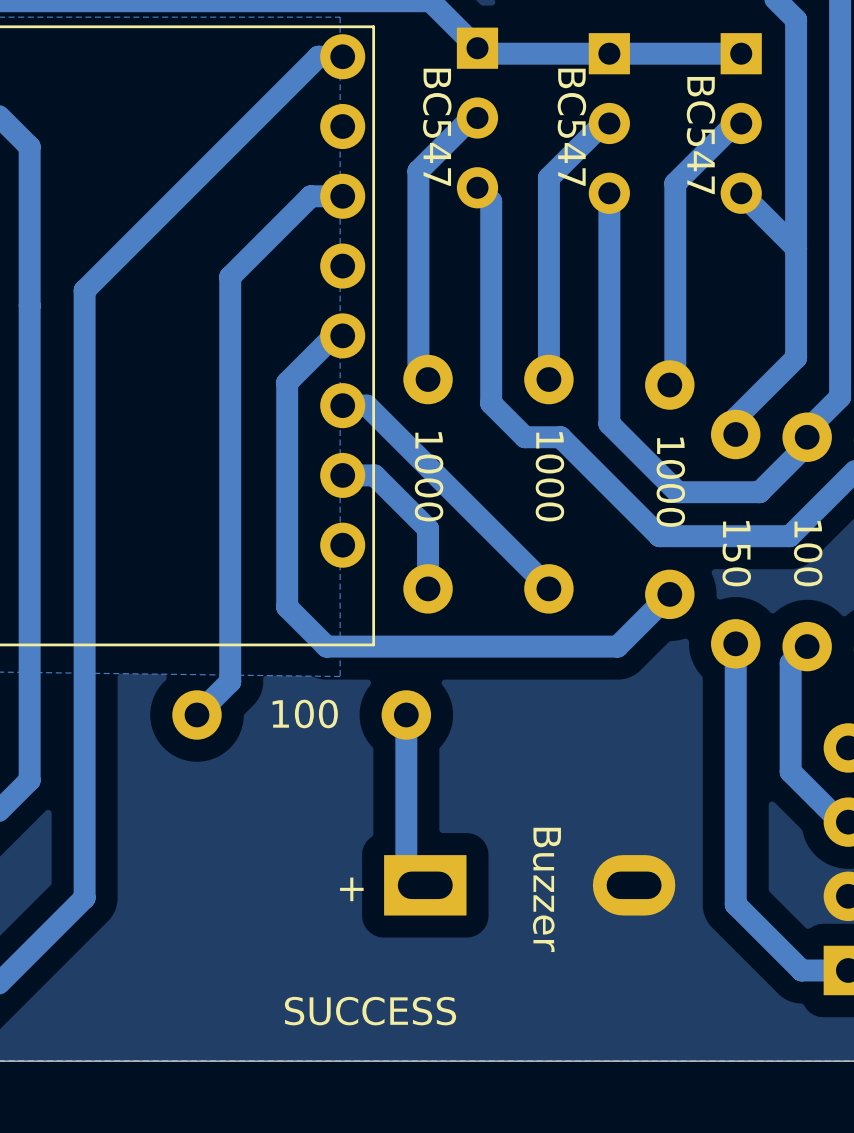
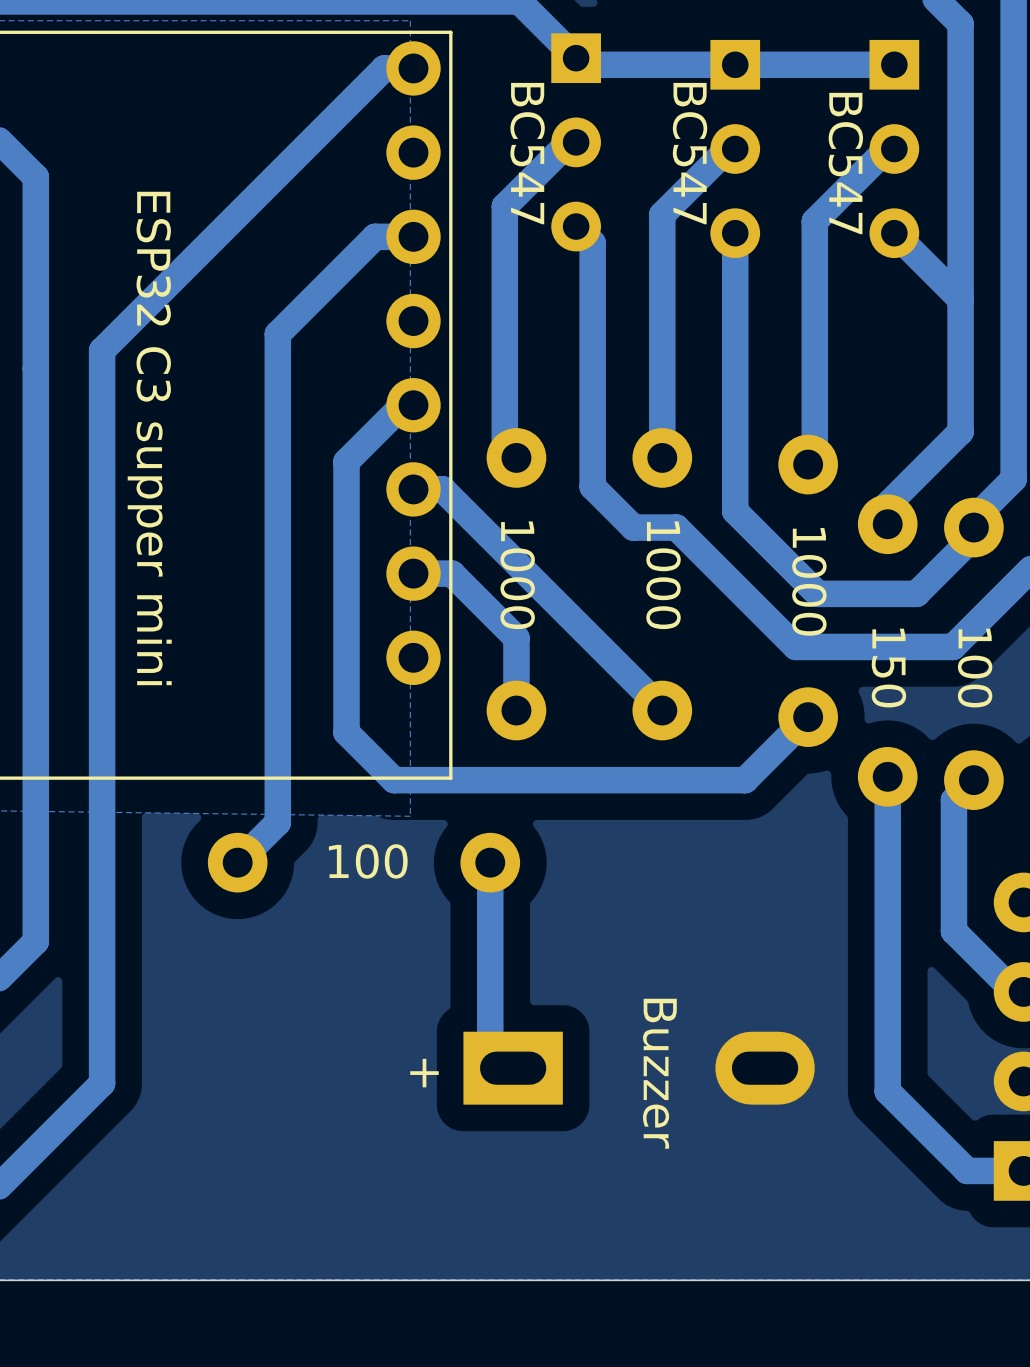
part value: none -> ESP32 C3 supper mini (149, 438)
text: SUCCESS (370, 1011) -> none

